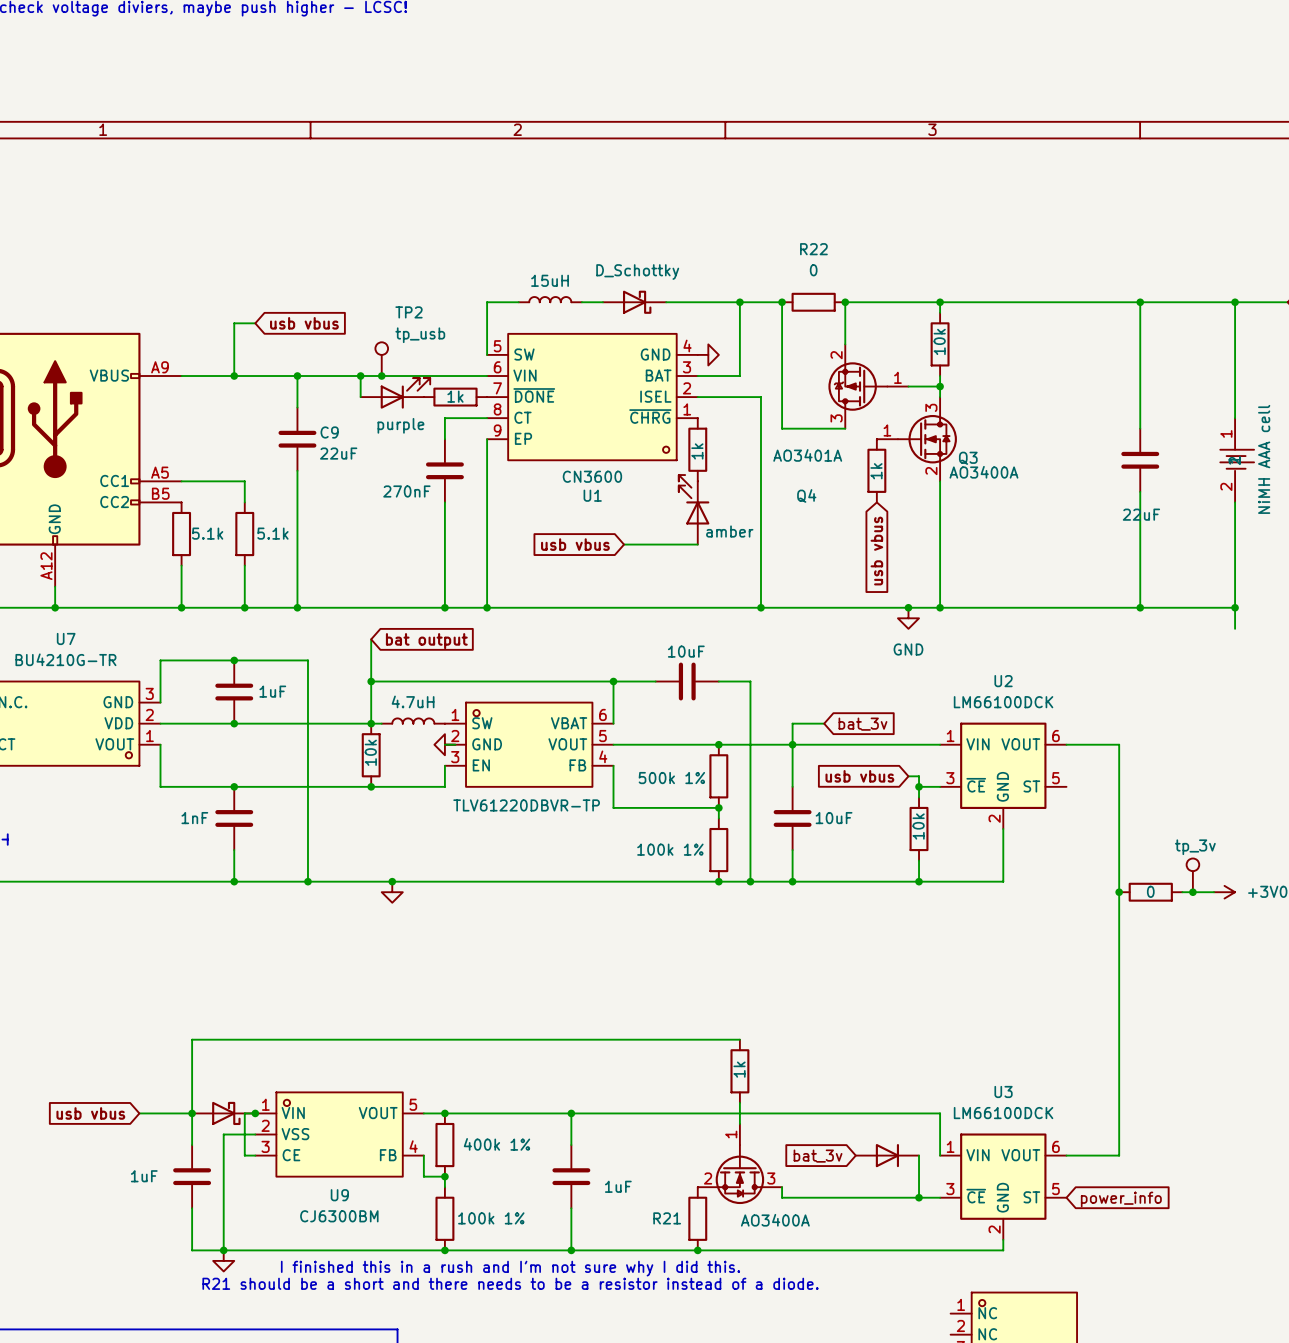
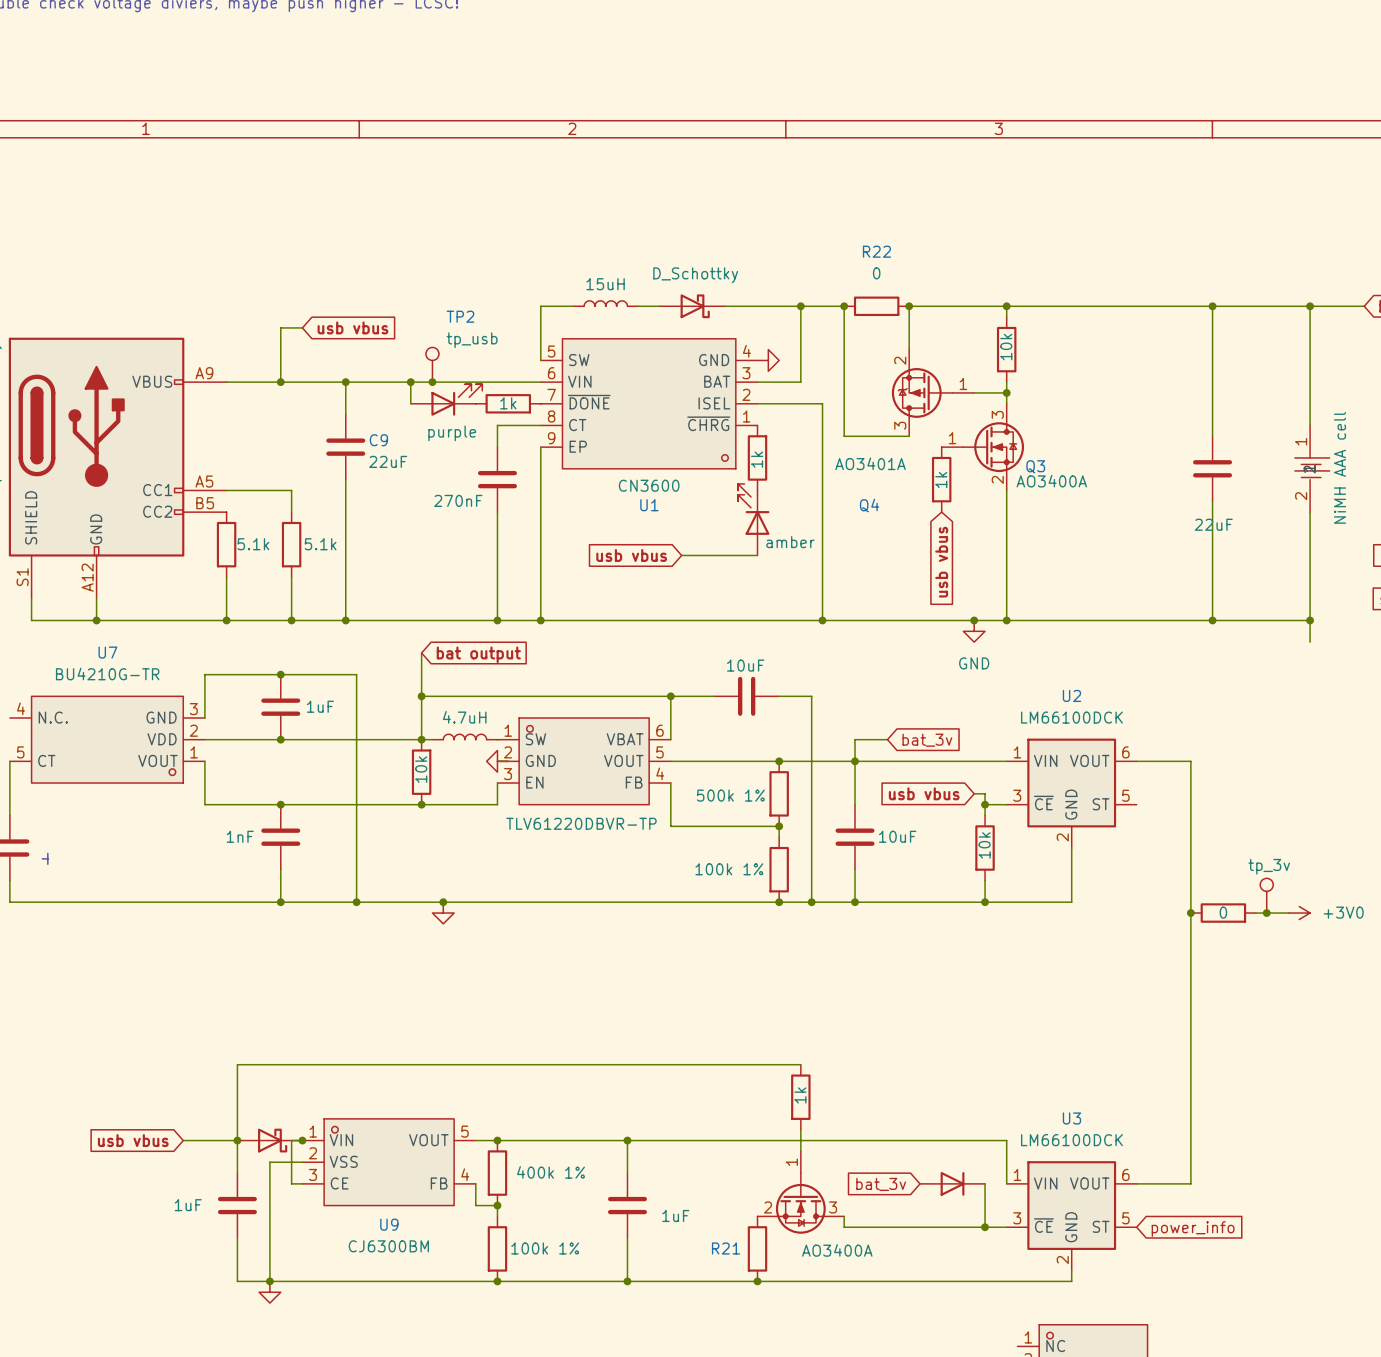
text: I finished this in a rush and I'm not sure why I did this. (510, 1268) -> none
text: R21 should be a short and there needs to be a resistor instead of a diode. (510, 1283) -> none

